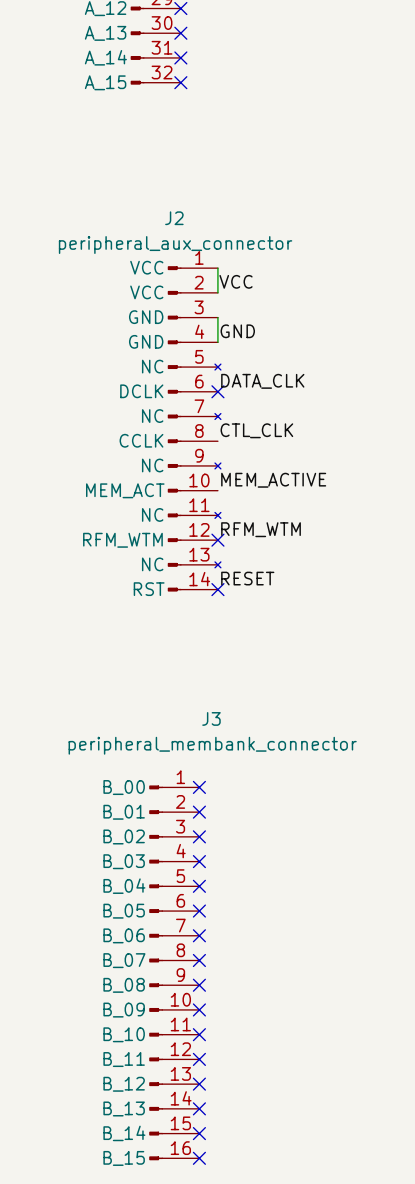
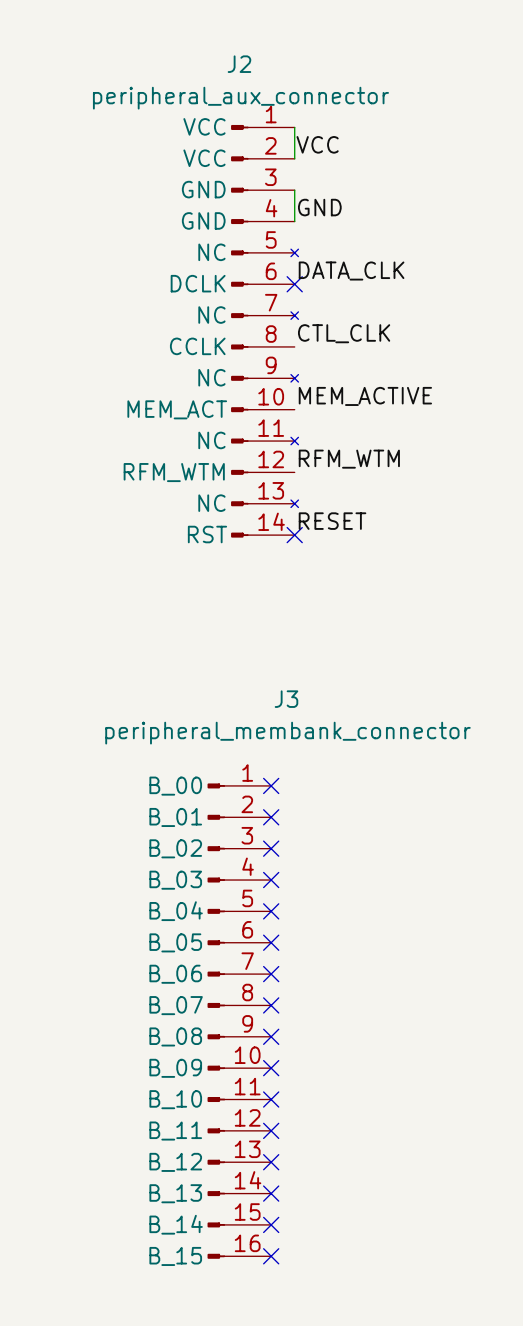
no-connect mark: (217, 540) -> none

